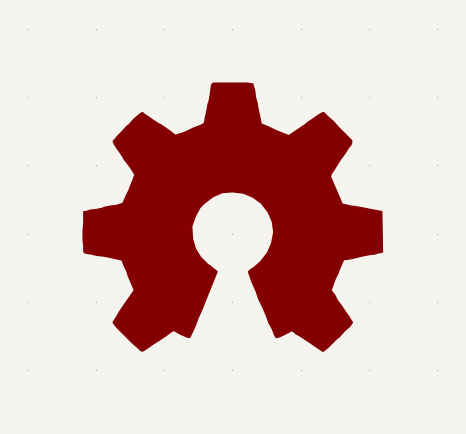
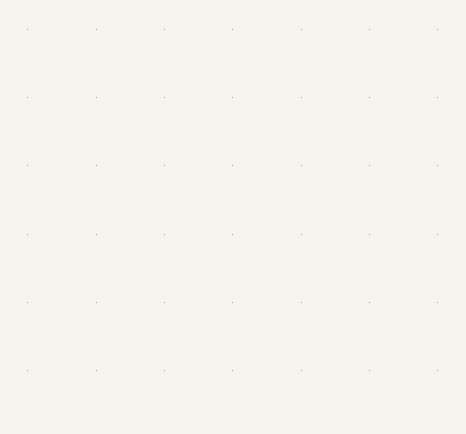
part: (232, 217) -> none

